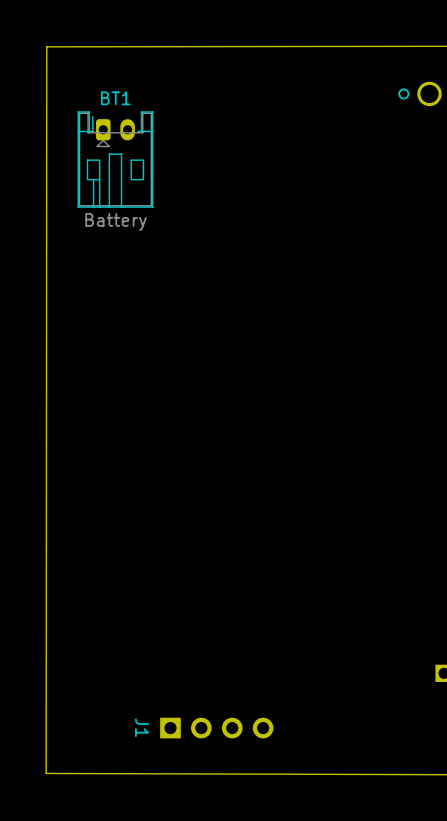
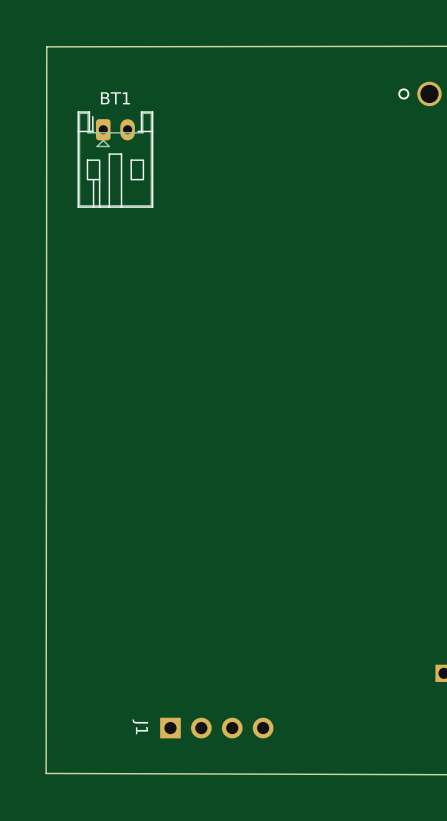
BT1 value: Battery (116, 221) -> none

